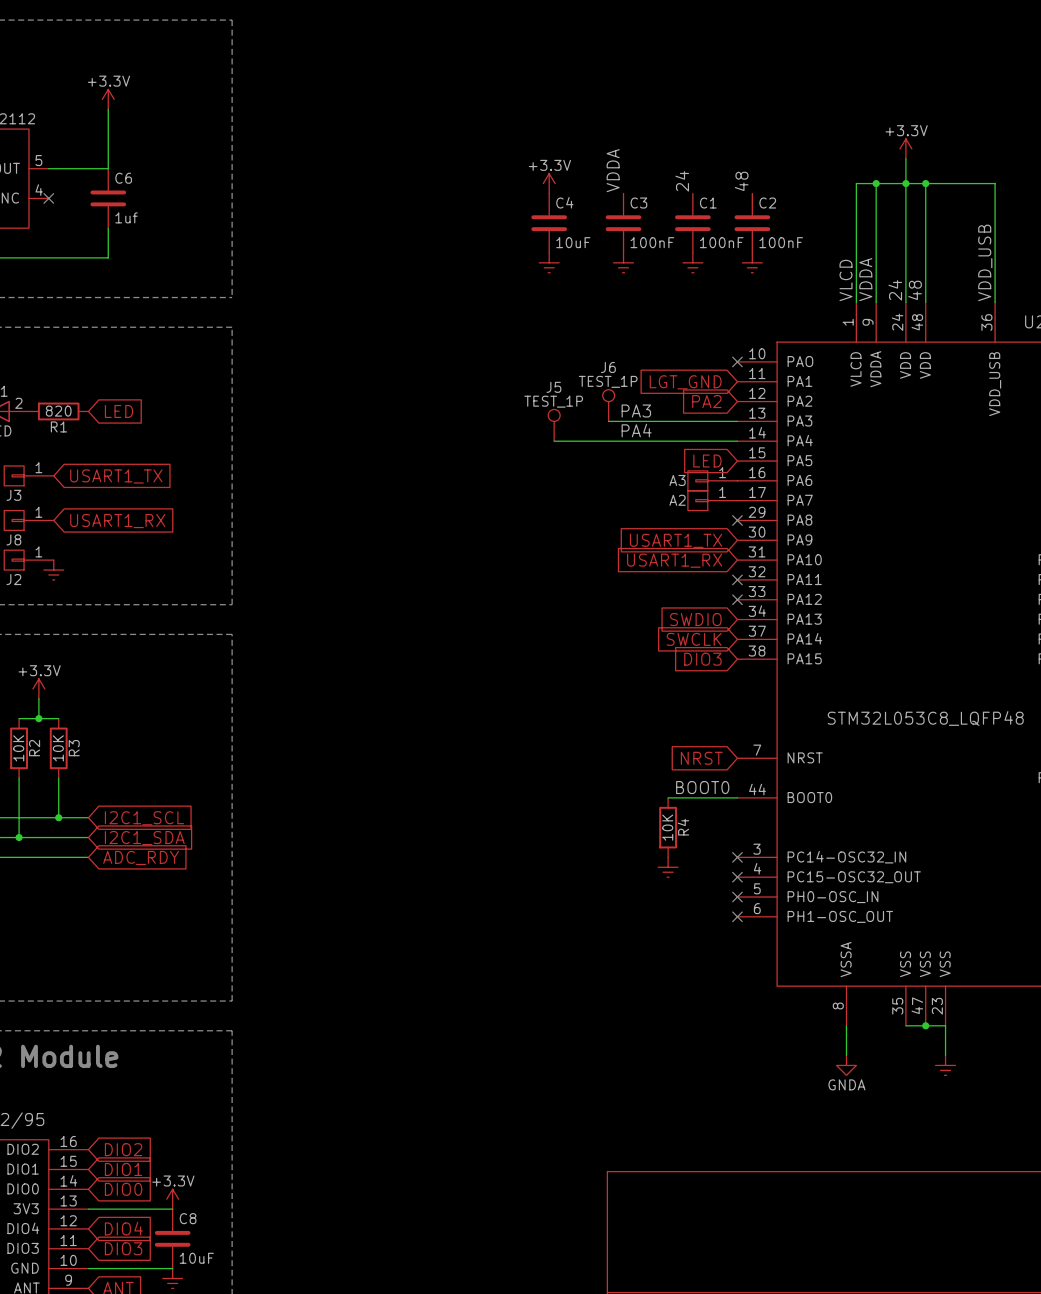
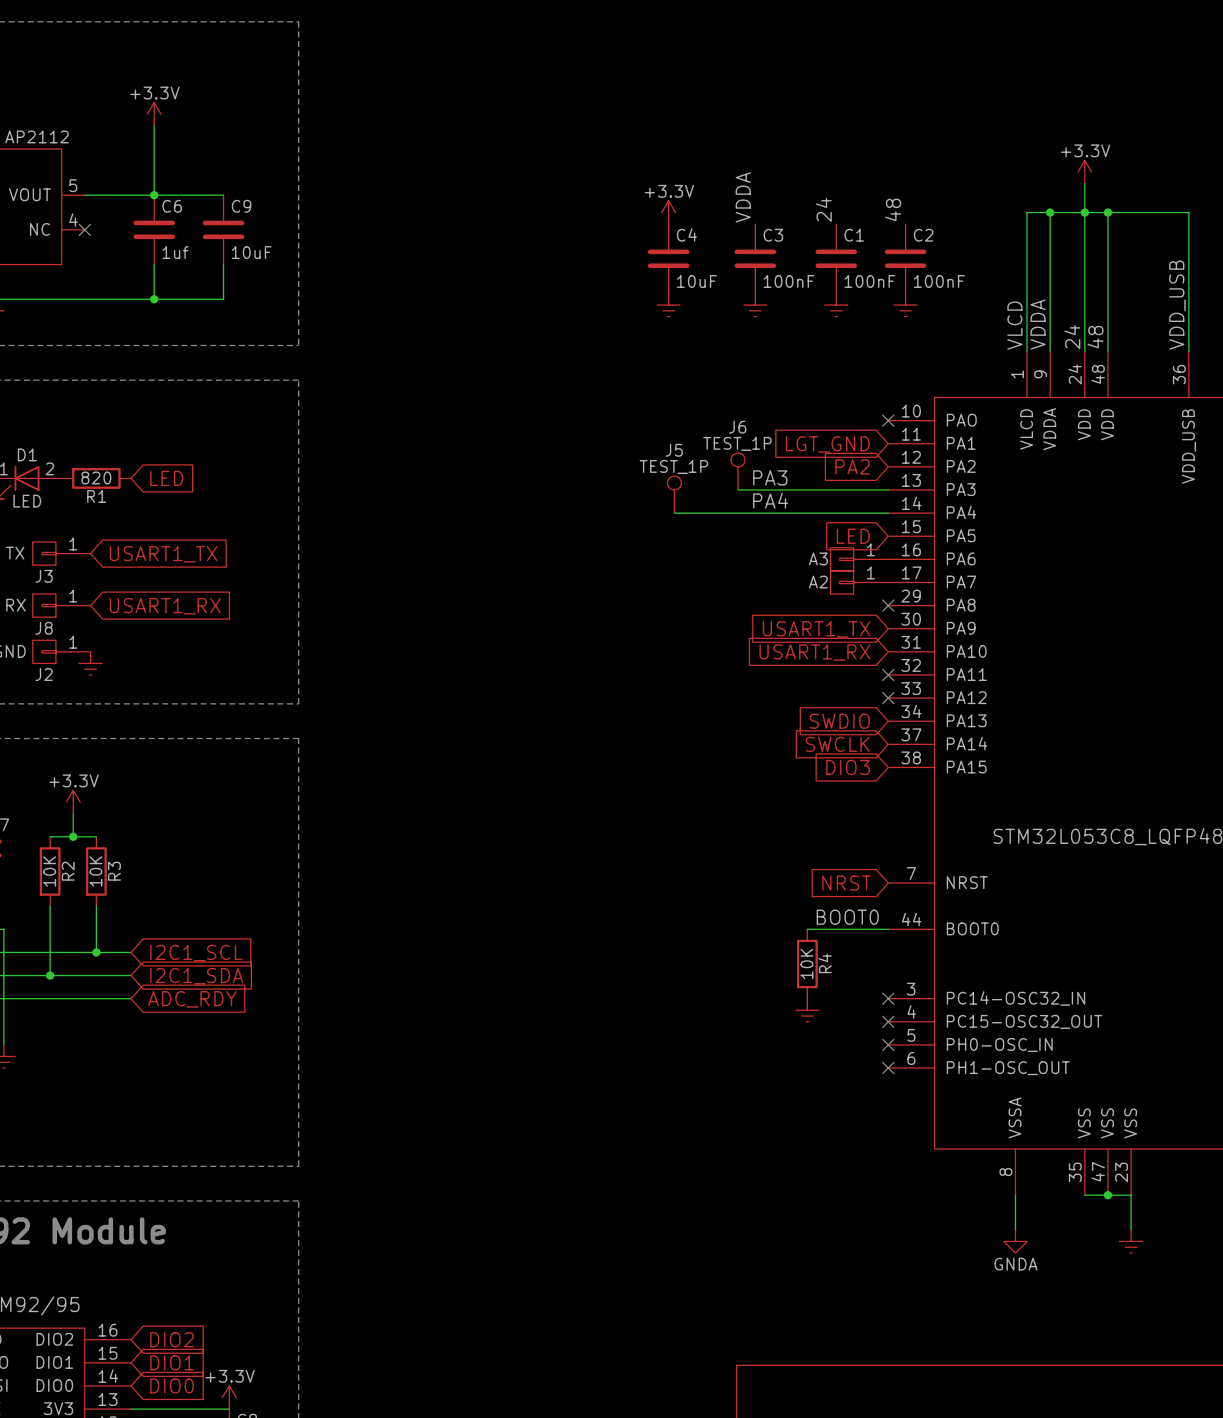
wire: none -> (154, 195) (223, 195)
junction: none -> (154, 195)
C9: none -> 10uF (223, 229)
wire: none -> (223, 264) (223, 299) (154, 299)
junction: none -> (154, 299)

